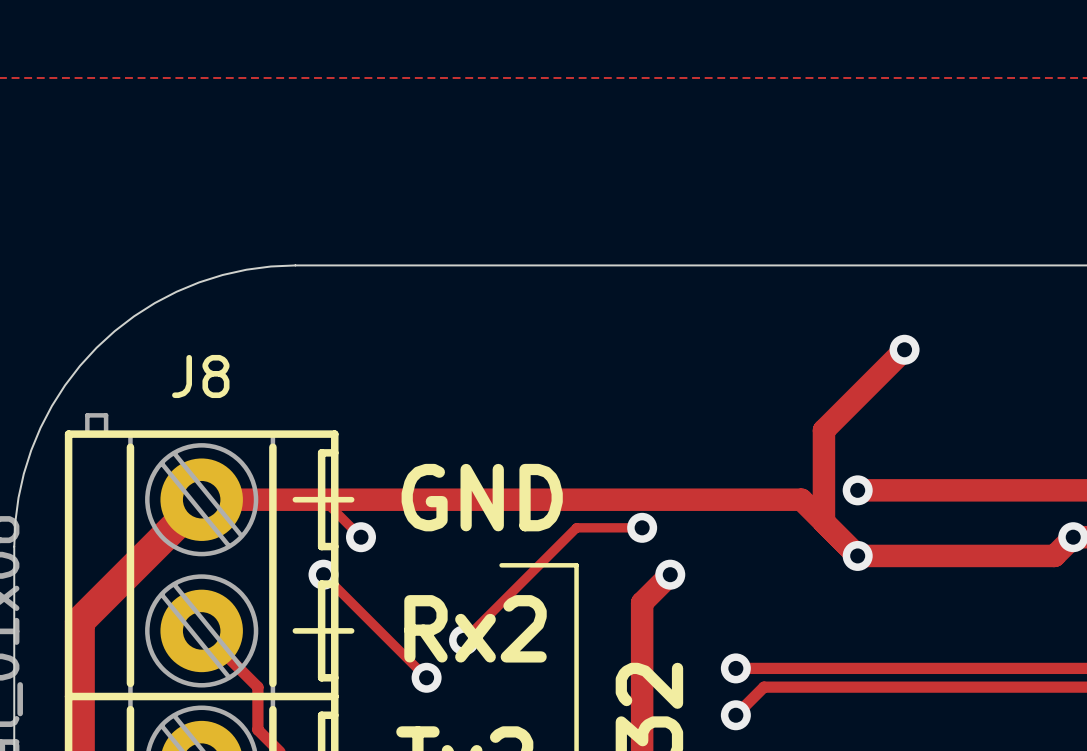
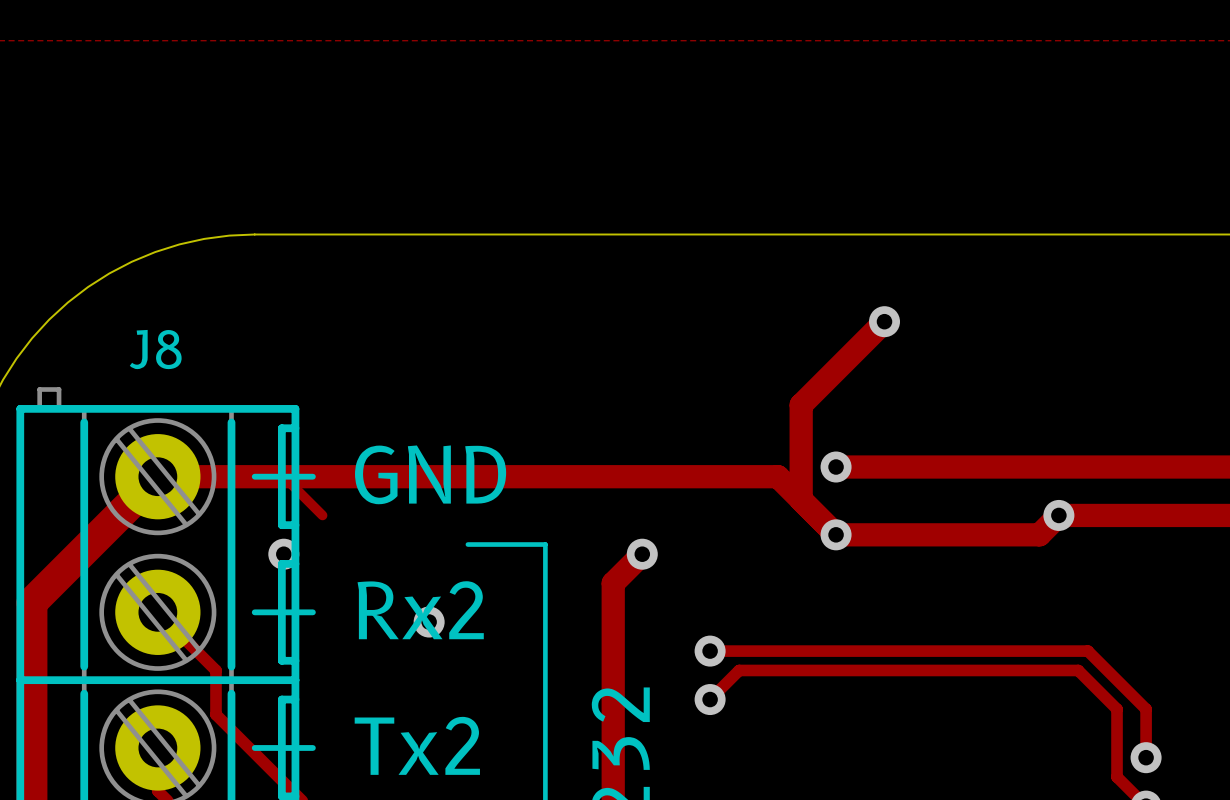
track: (642, 527) (576, 527) (464, 640) -> none
via: (642, 527) -> none
via: (361, 537) -> none
track: (323, 574) (426, 677) -> none
via: (426, 677) -> none

